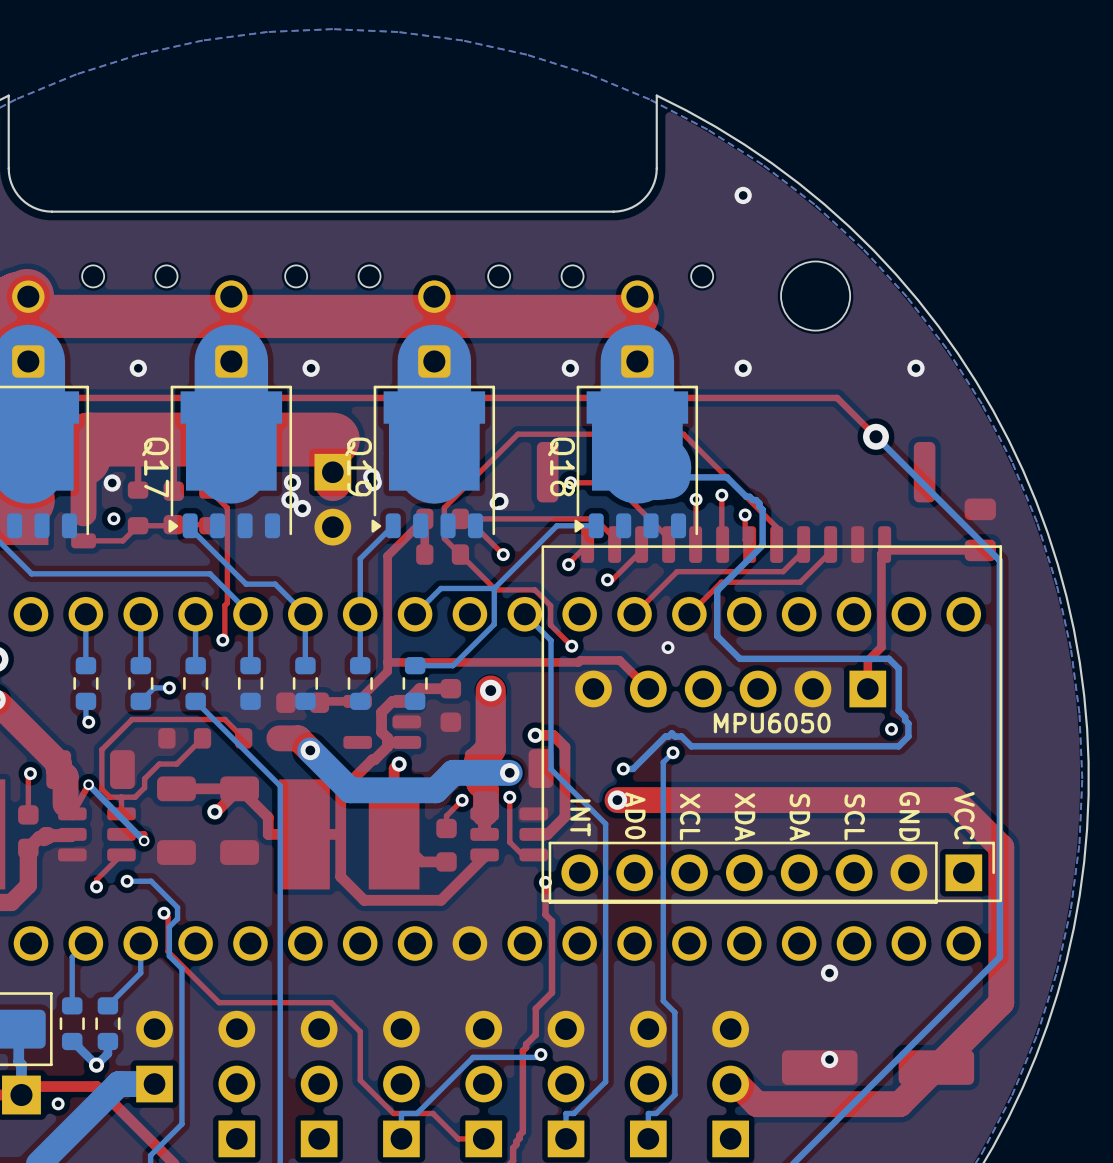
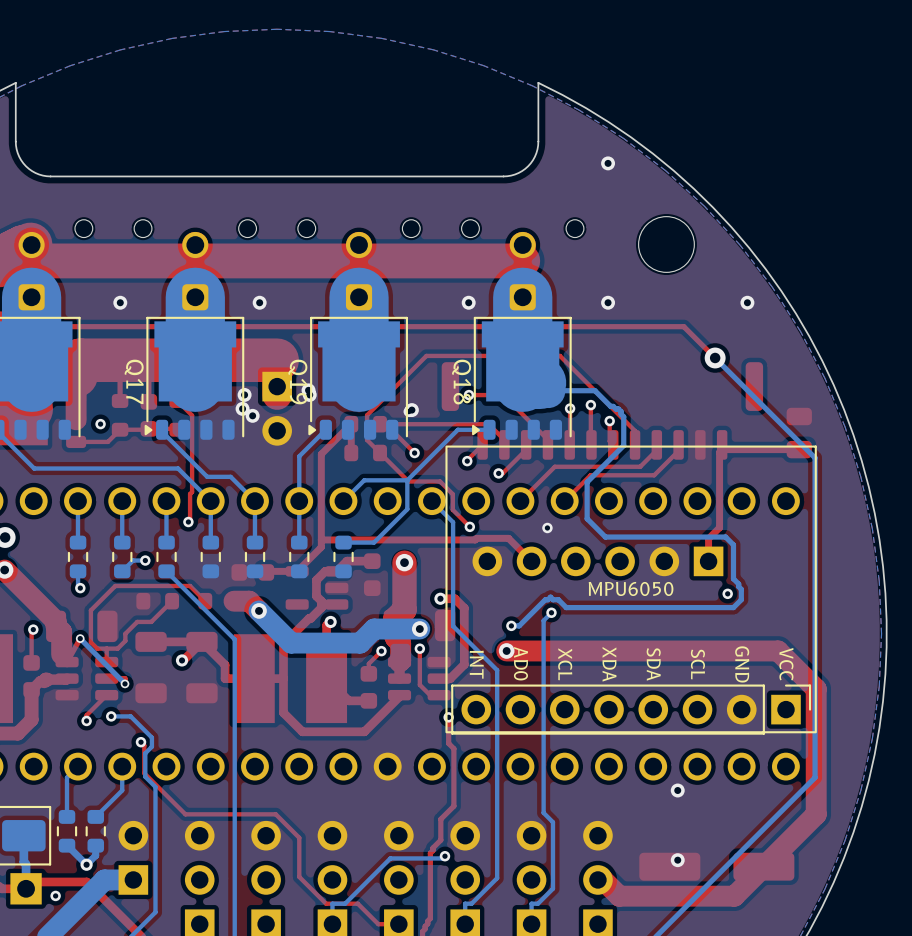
via: (112, 483) -> none

